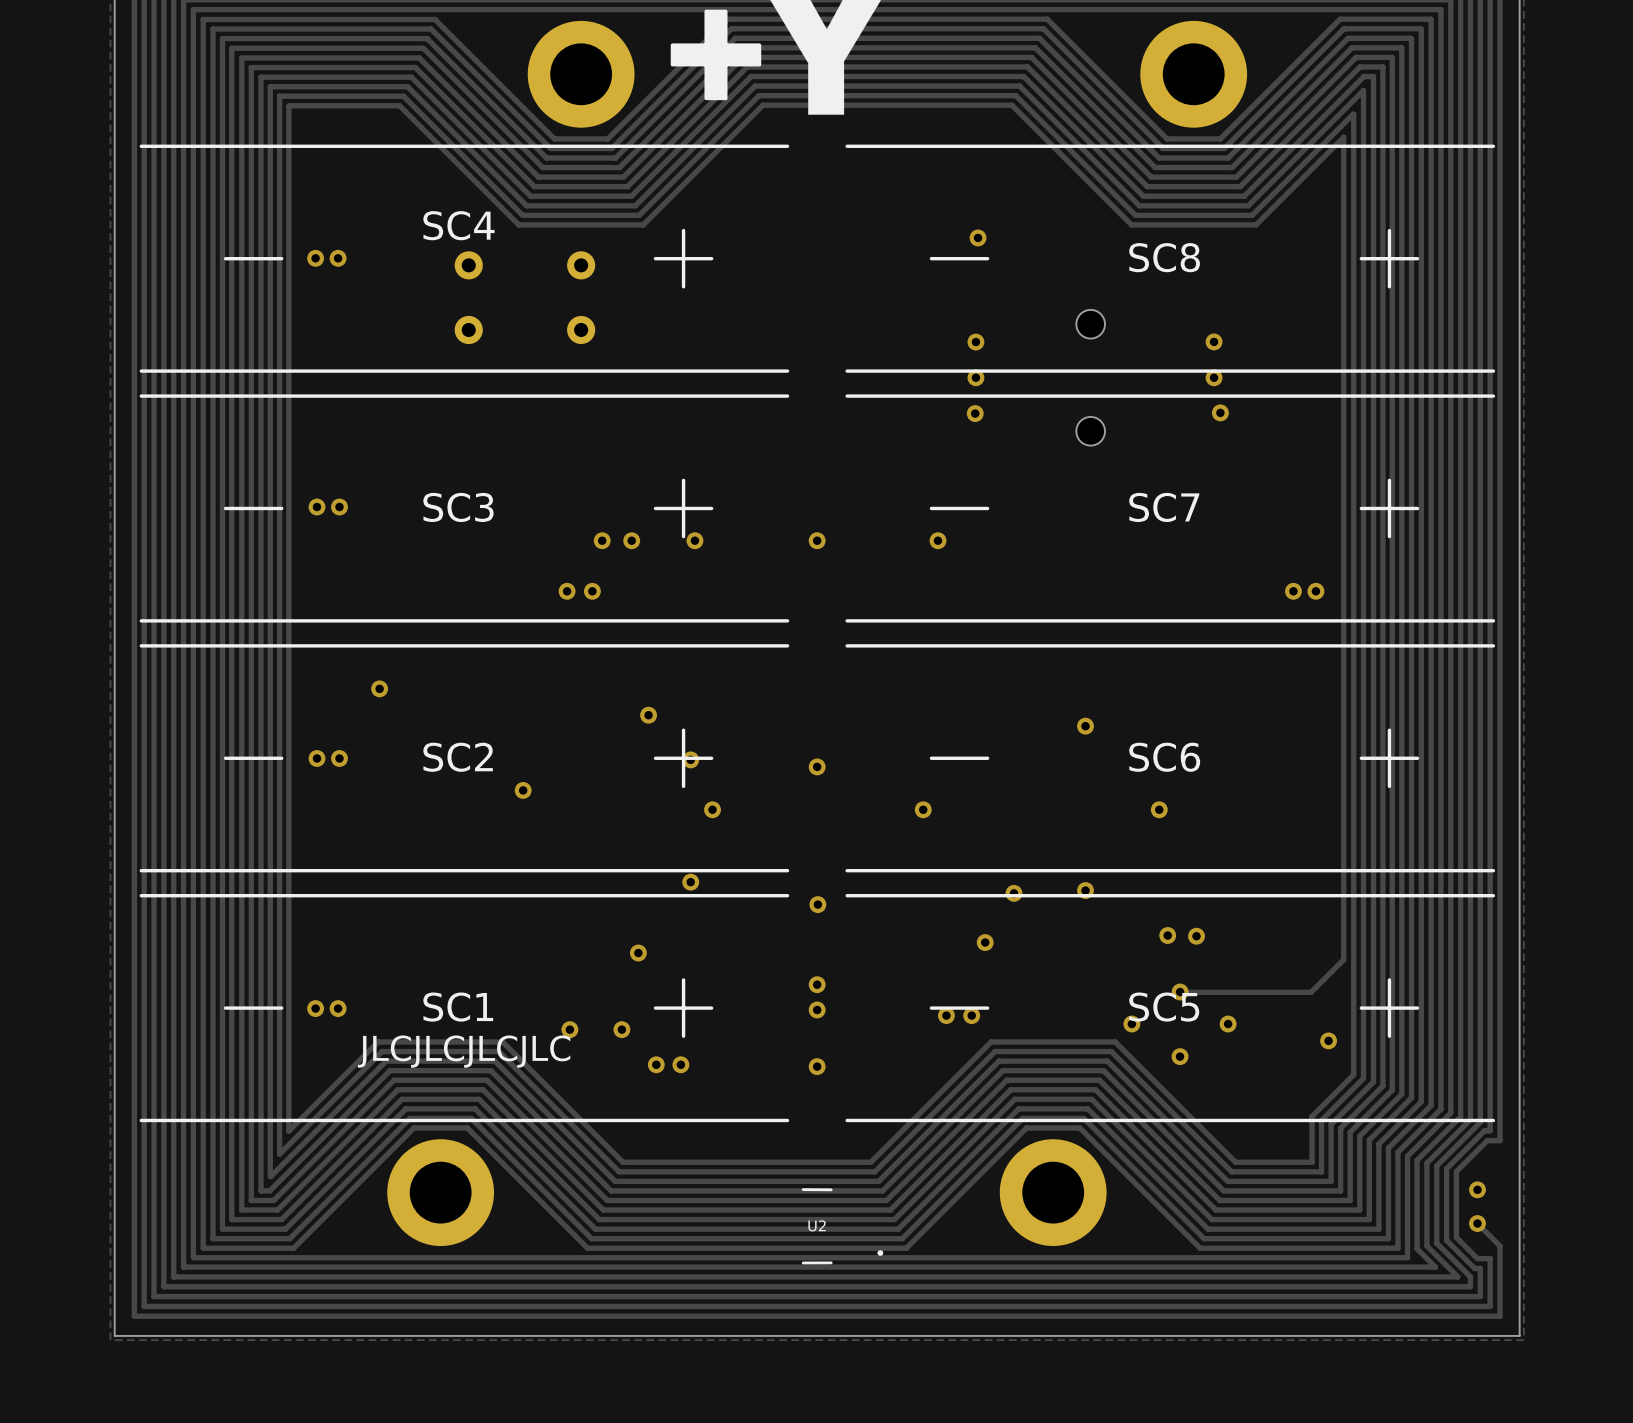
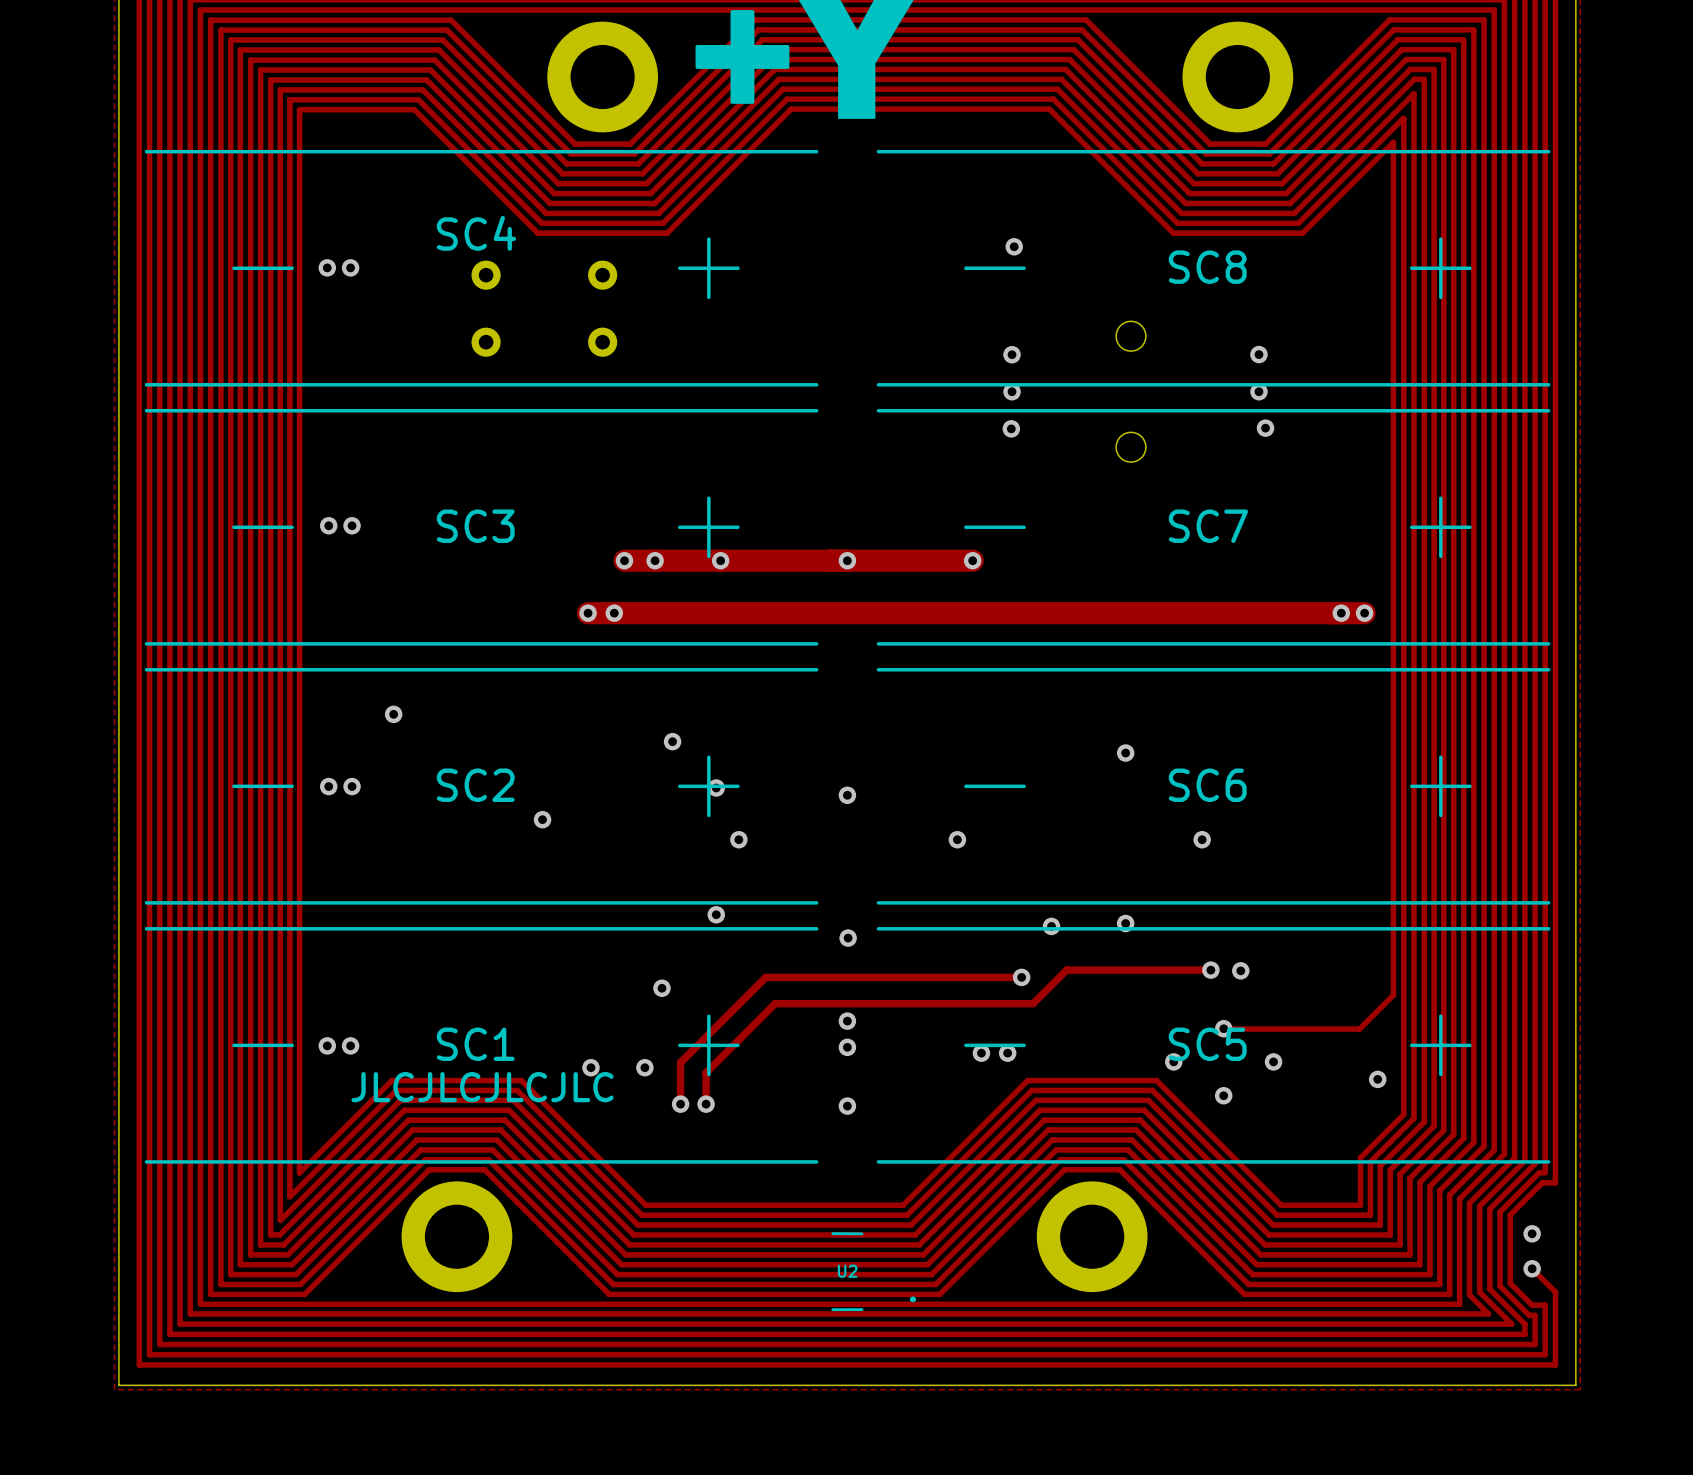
track: none -> (624, 560) (972, 560)
track: none -> (588, 613) (1364, 613)
track: none -> (1210, 970) (1066, 970) (1033, 1003) (775, 1003) (706, 1072) (706, 1104)
track: none -> (1021, 977) (765, 977) (680, 1062) (680, 1104)

